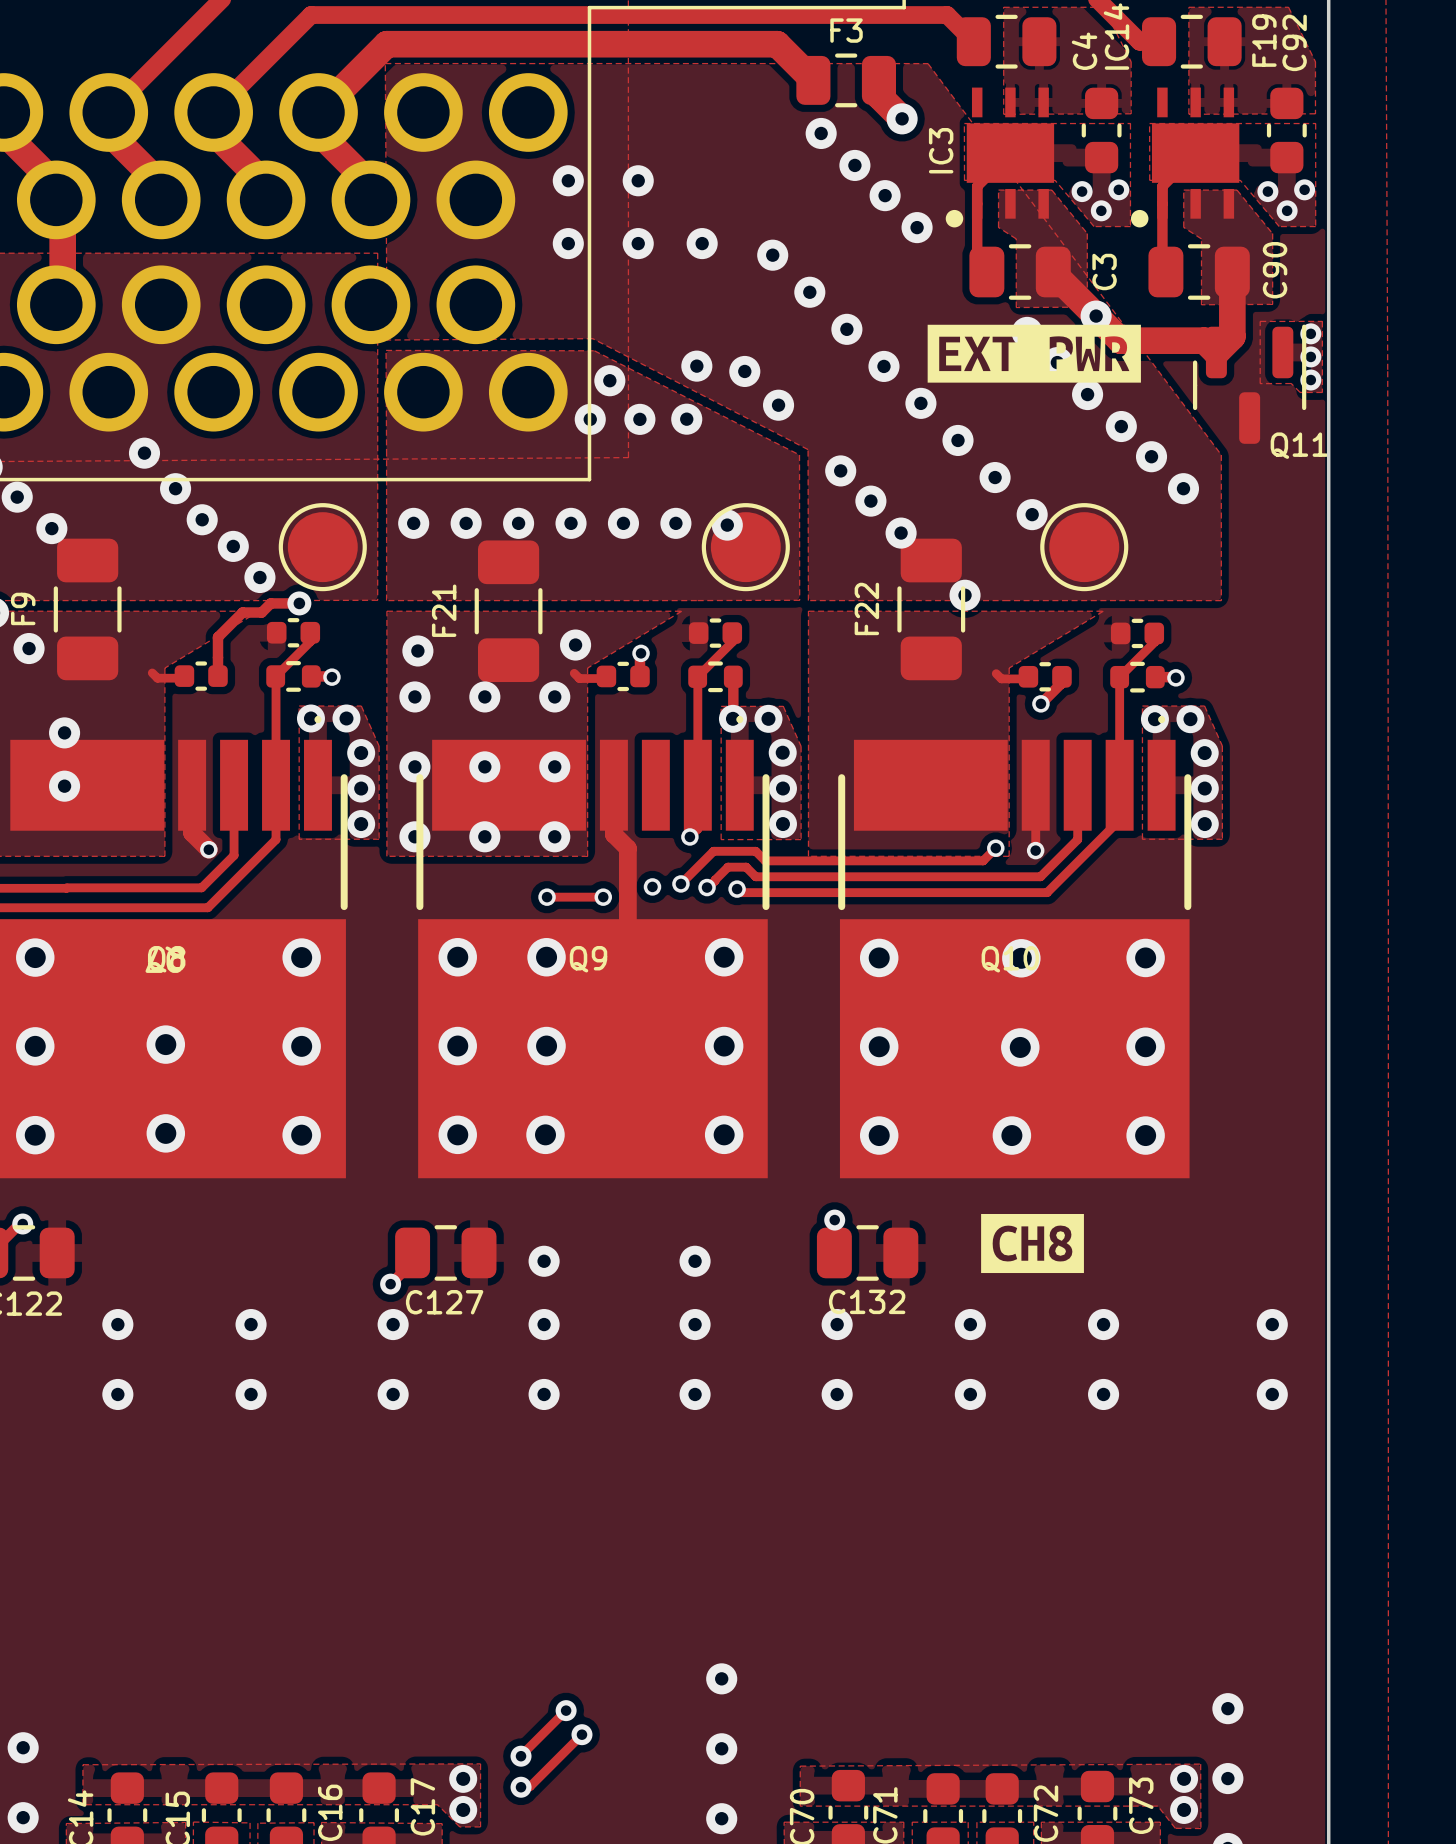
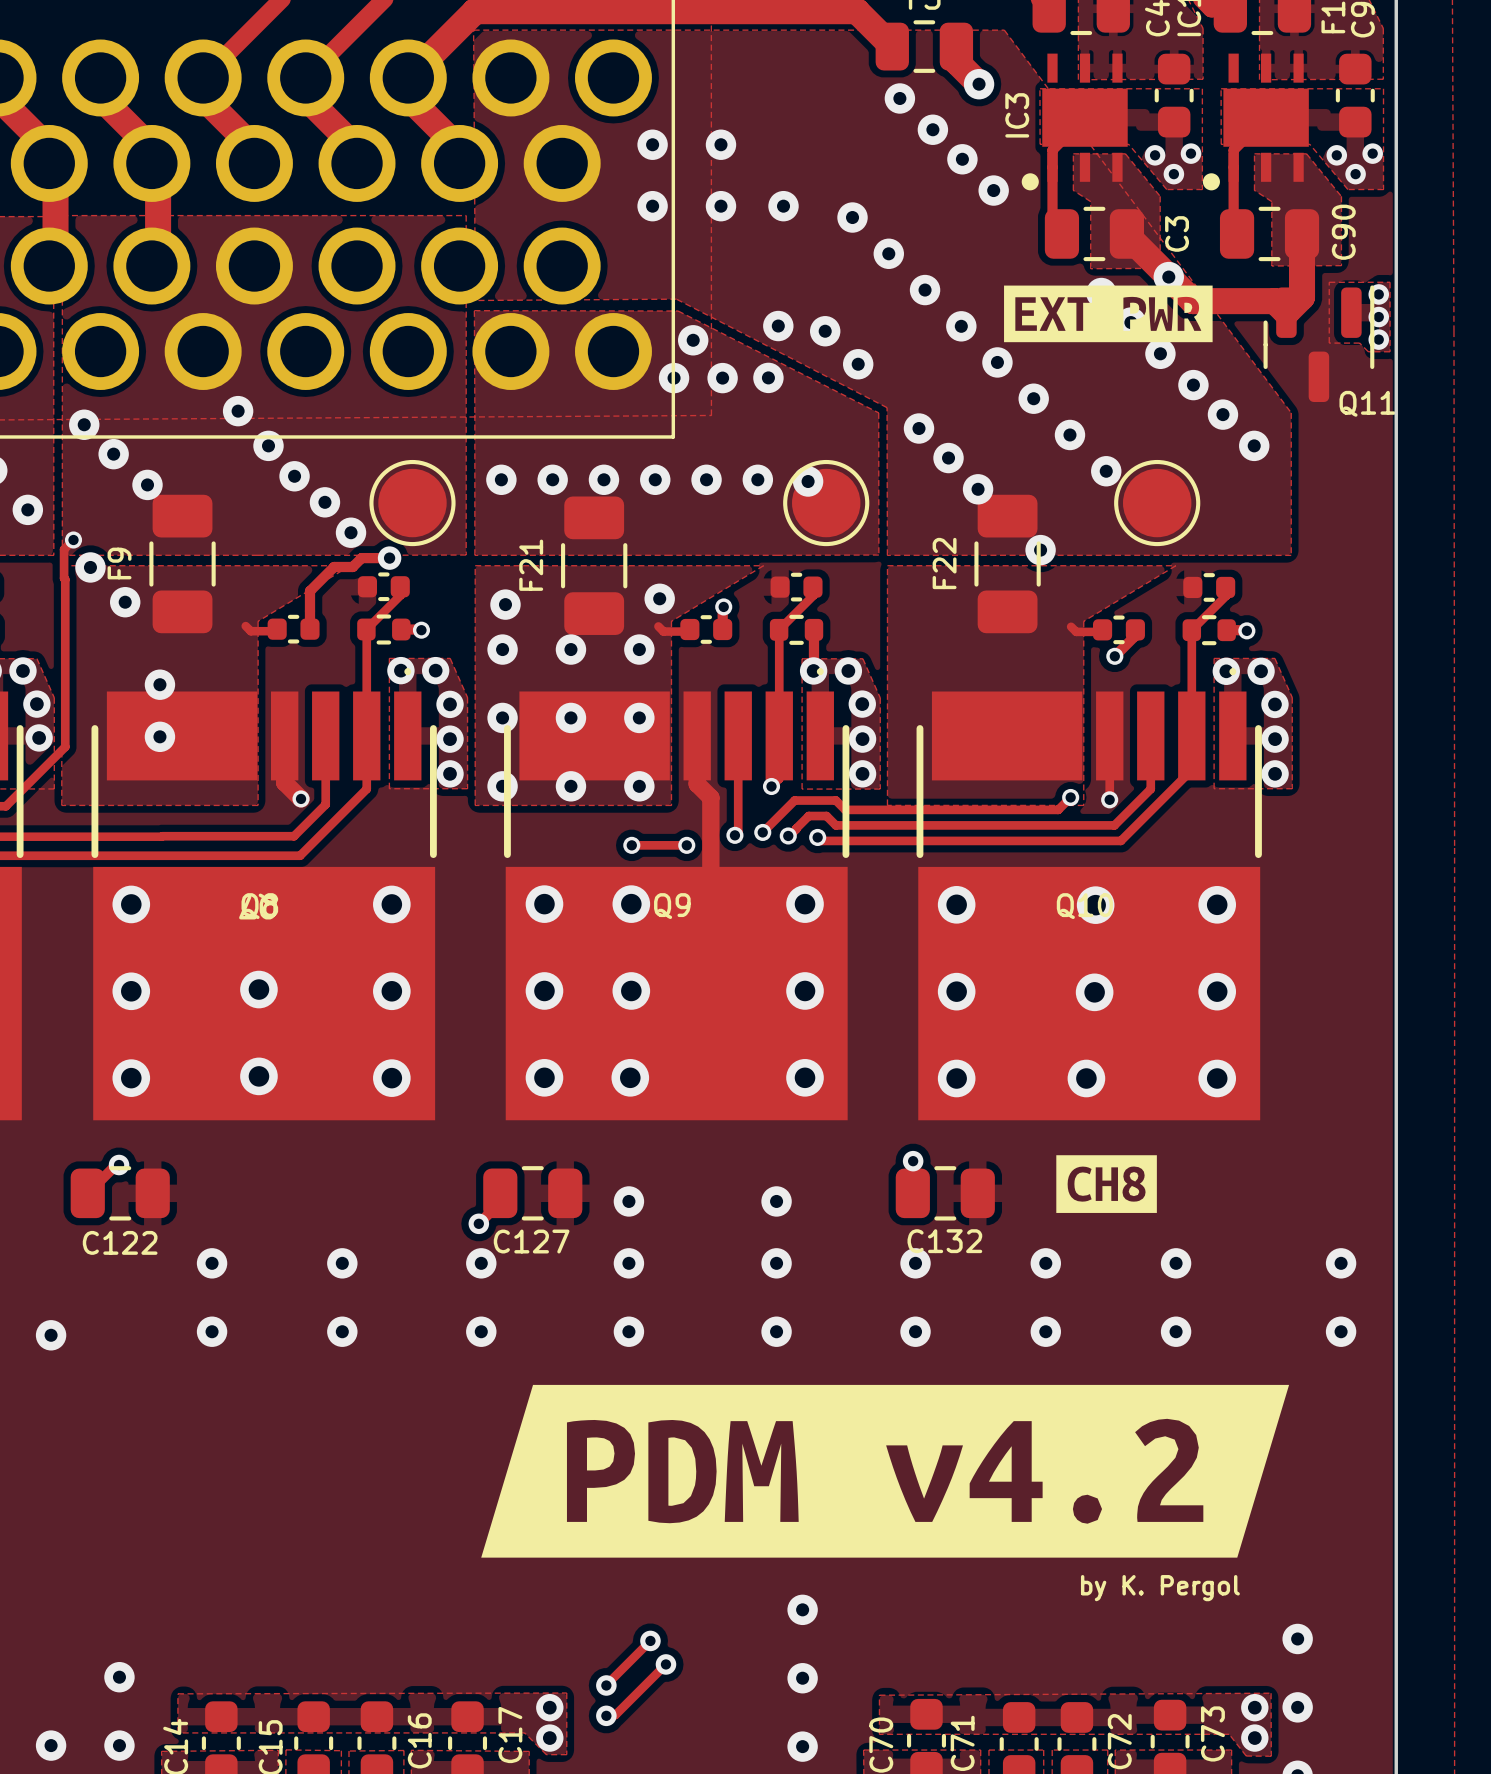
track: none -> (738, 735) (738, 832) (734, 835)
drawing: none -> [481, 1384, 1290, 1558]
text: none -> by K. Pergol (1160, 1588)

